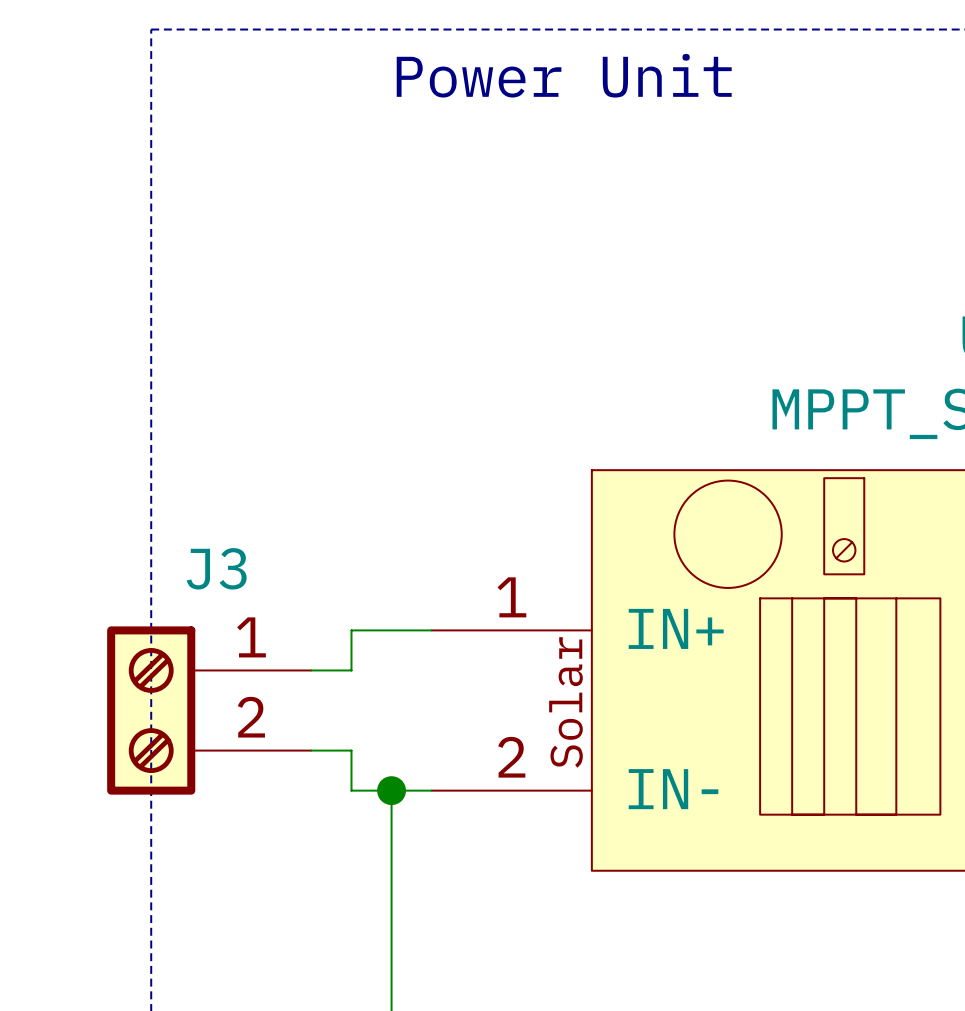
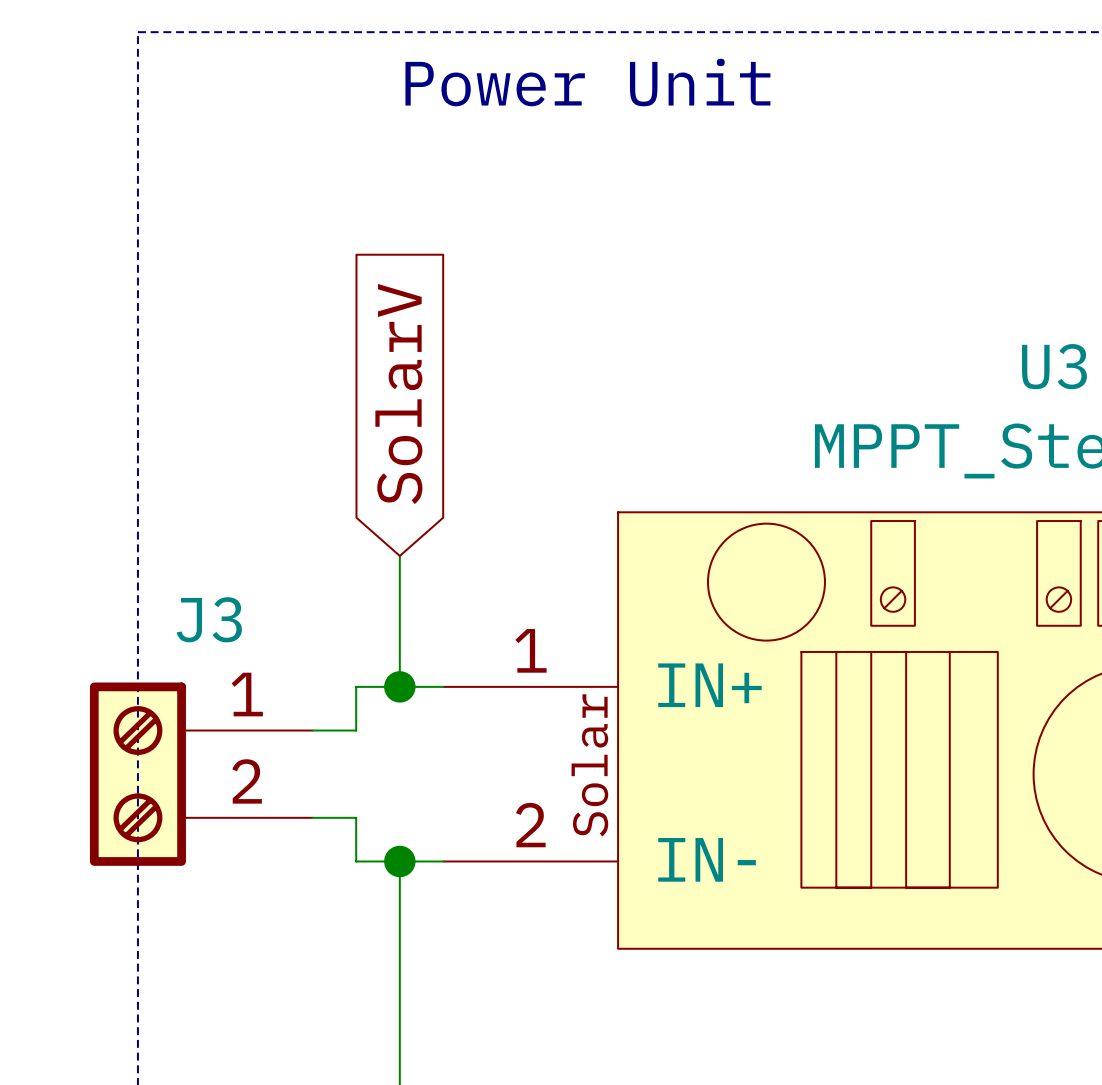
global label: none -> SolarV (398, 393)
wire: none -> (399, 555) (399, 686)
junction: none -> (399, 686)

